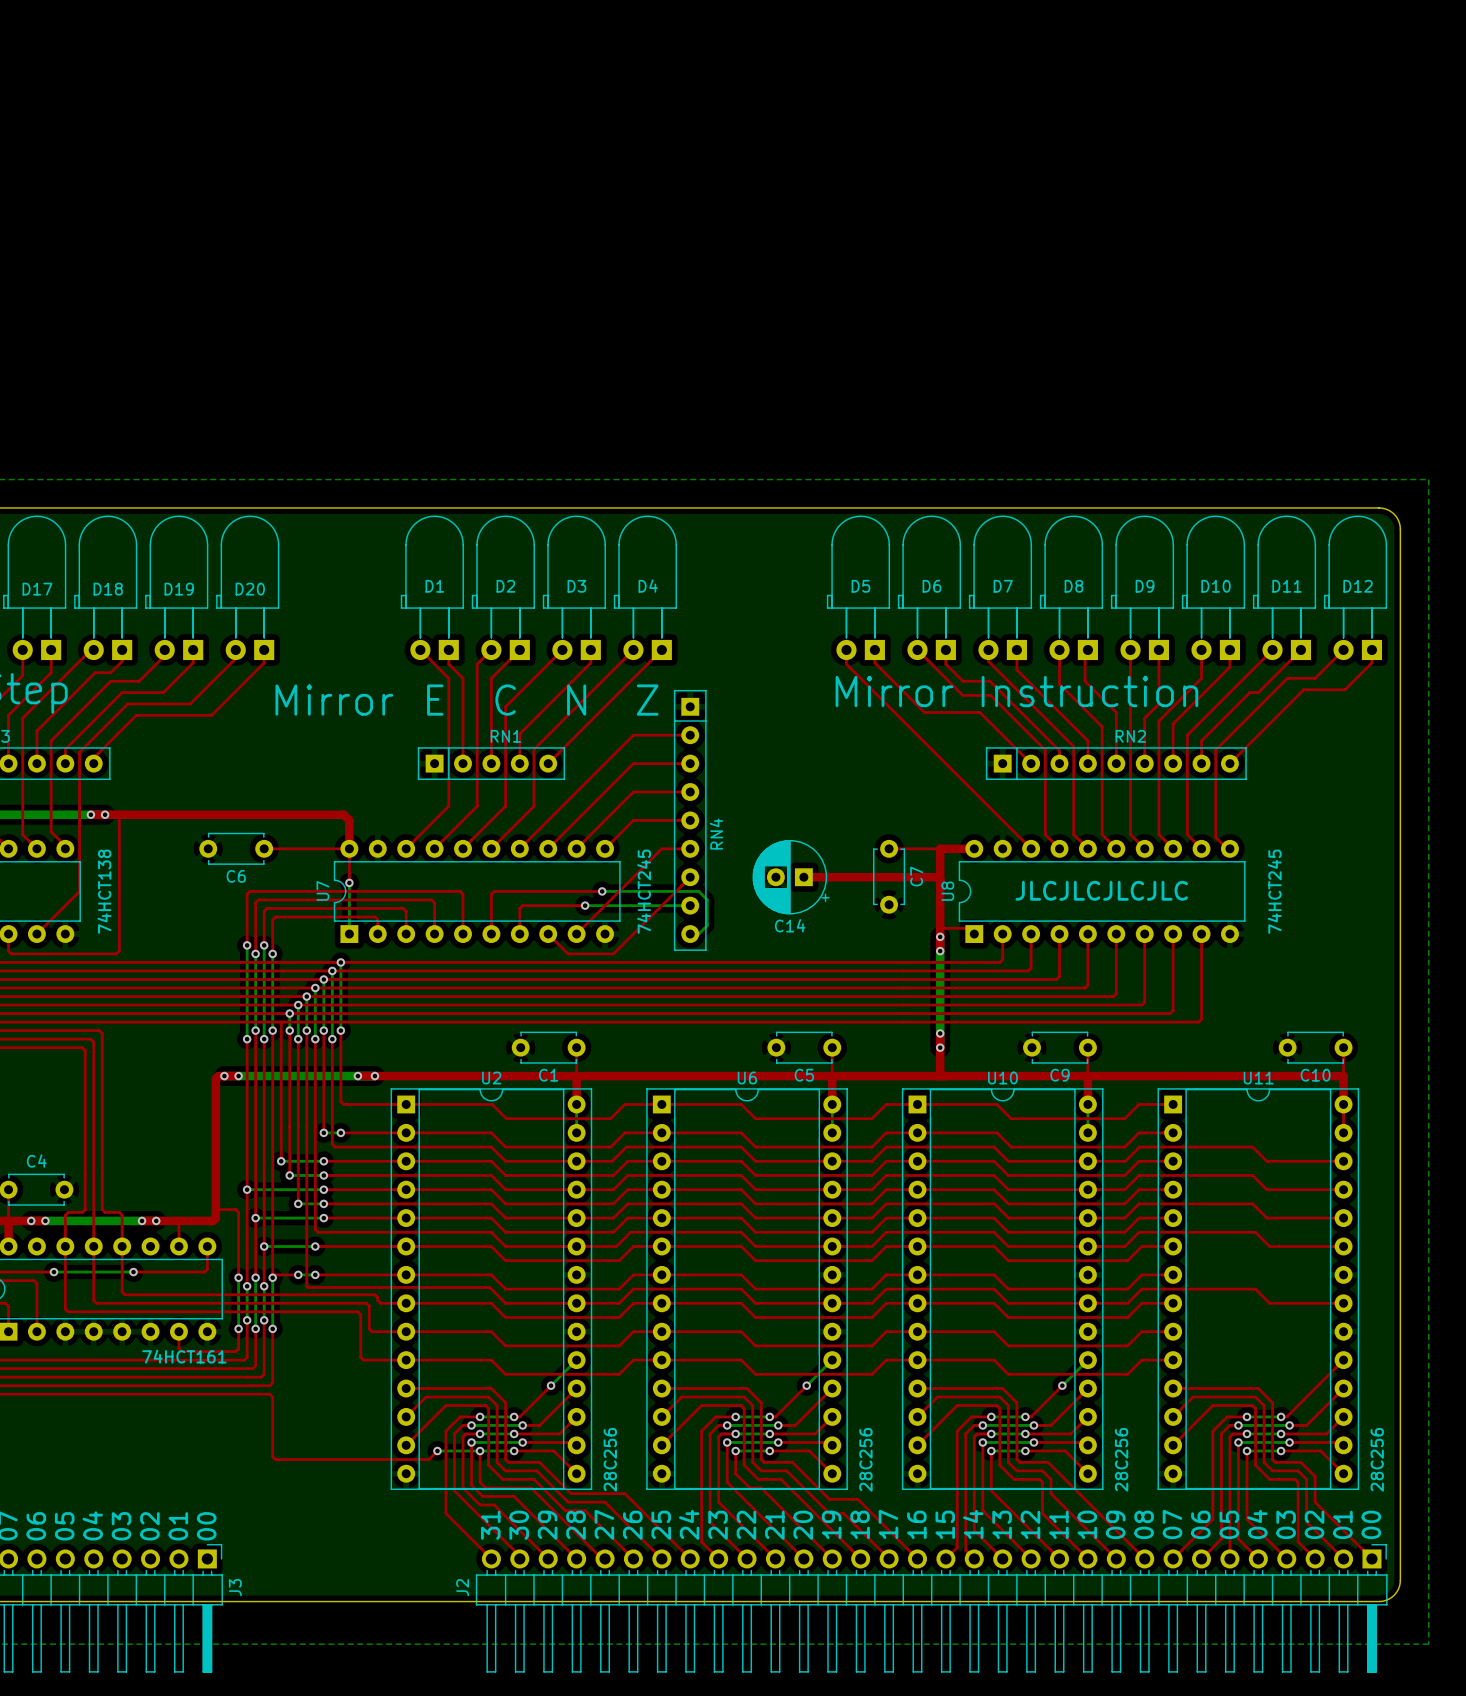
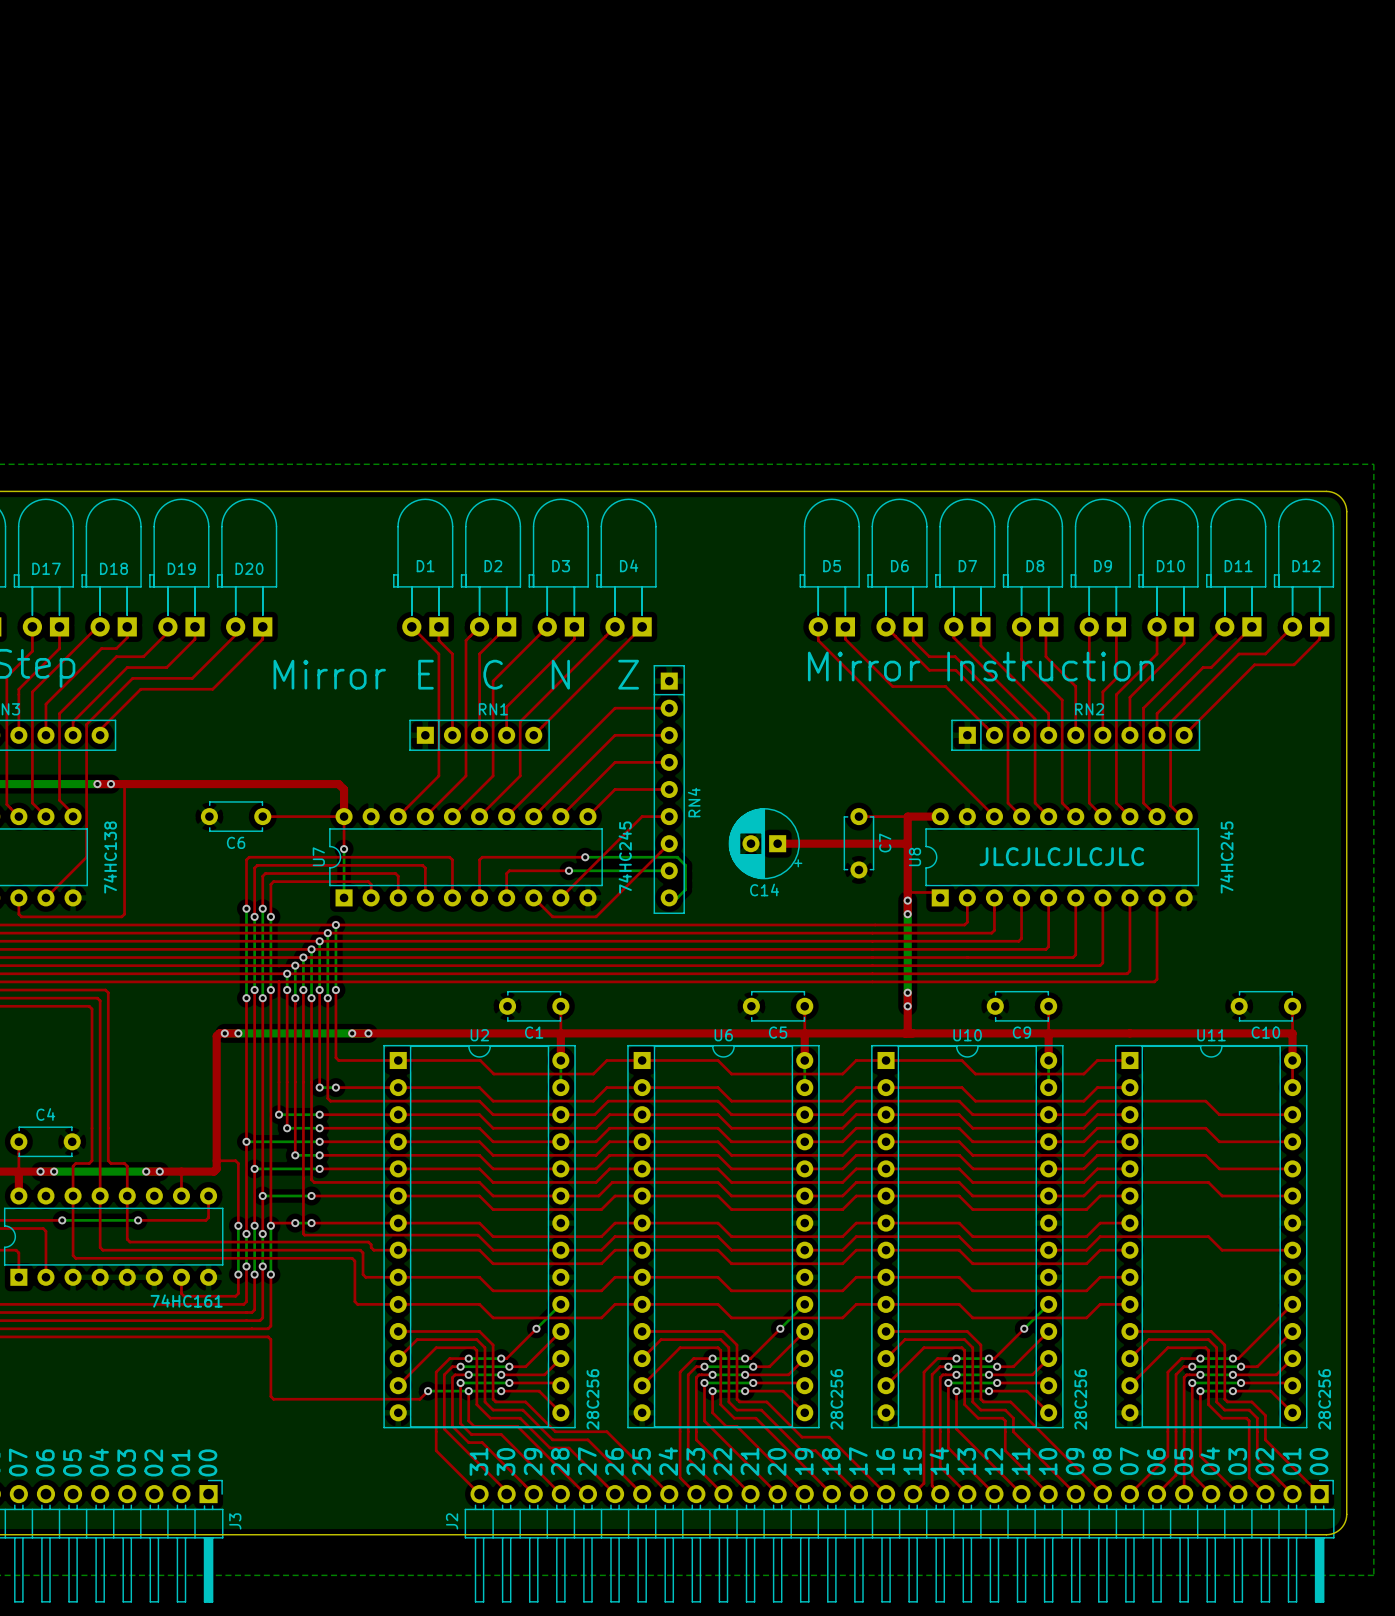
part value: 74HCT138 (104, 891) -> 74HC138 (110, 857)
U7 value: 74HCT245 (644, 891) -> 74HC245 (625, 857)
U8 value: 74HCT245 (1274, 891) -> 74HC245 (1226, 857)
part value: 74HCT161 (184, 1356) -> 74HC161 (186, 1301)

